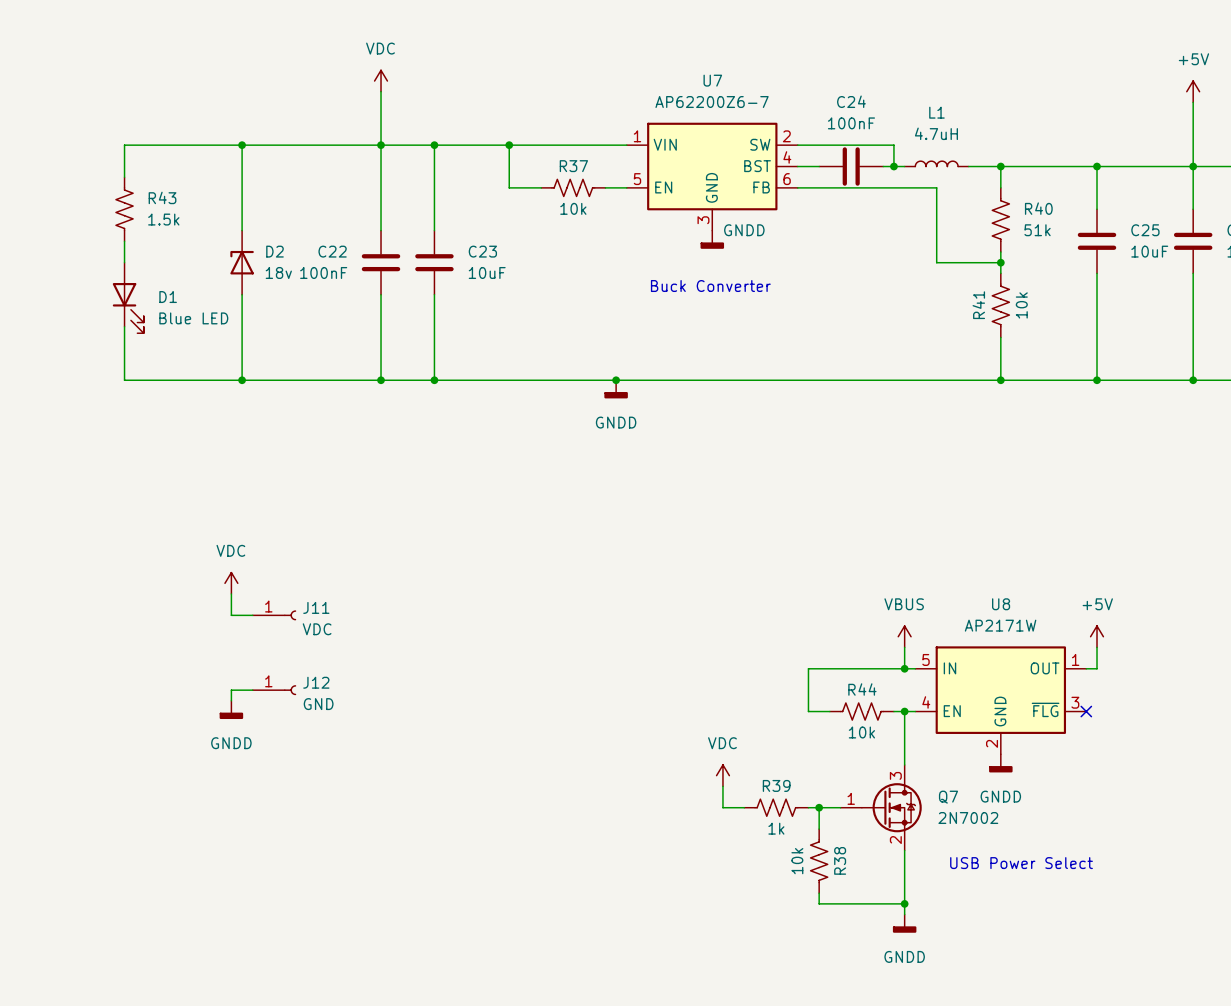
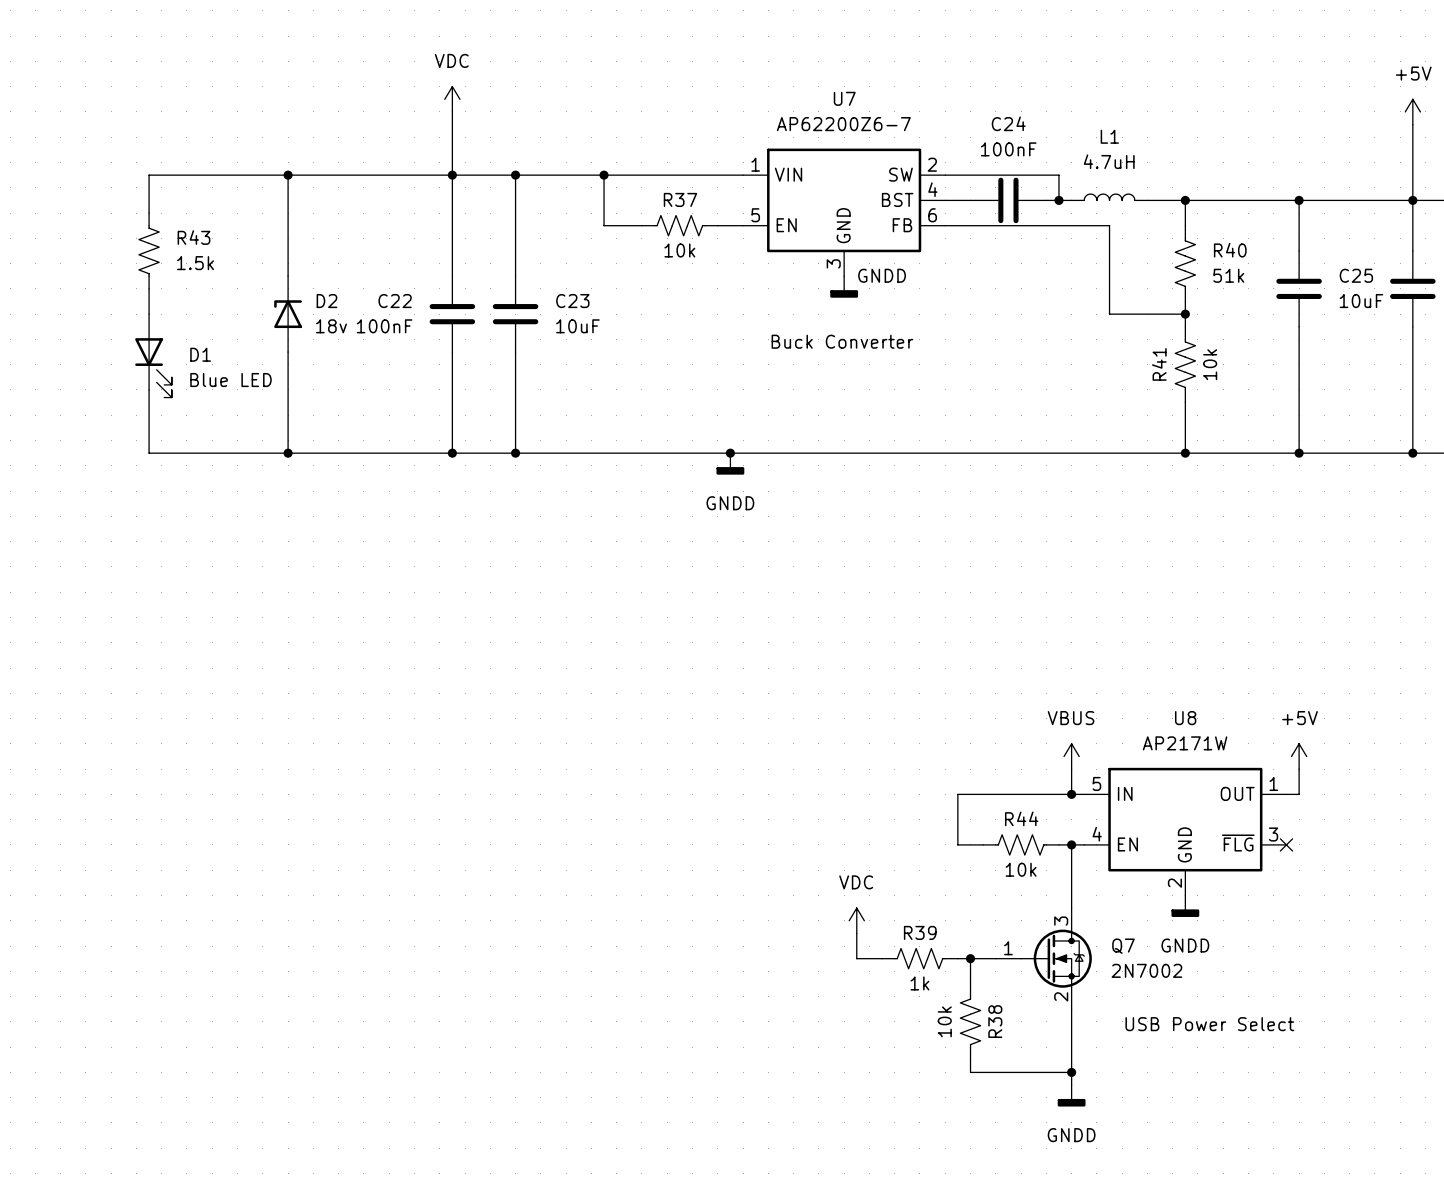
power symbol: VDC (231, 583) -> none
wire: (231, 593) (231, 615) (252, 615) -> none
J11: VDC (274, 615) -> none
wire: (252, 690) (231, 690) (231, 700) -> none
J12: GND (274, 690) -> none
power symbol: GNDD (231, 709) -> none

